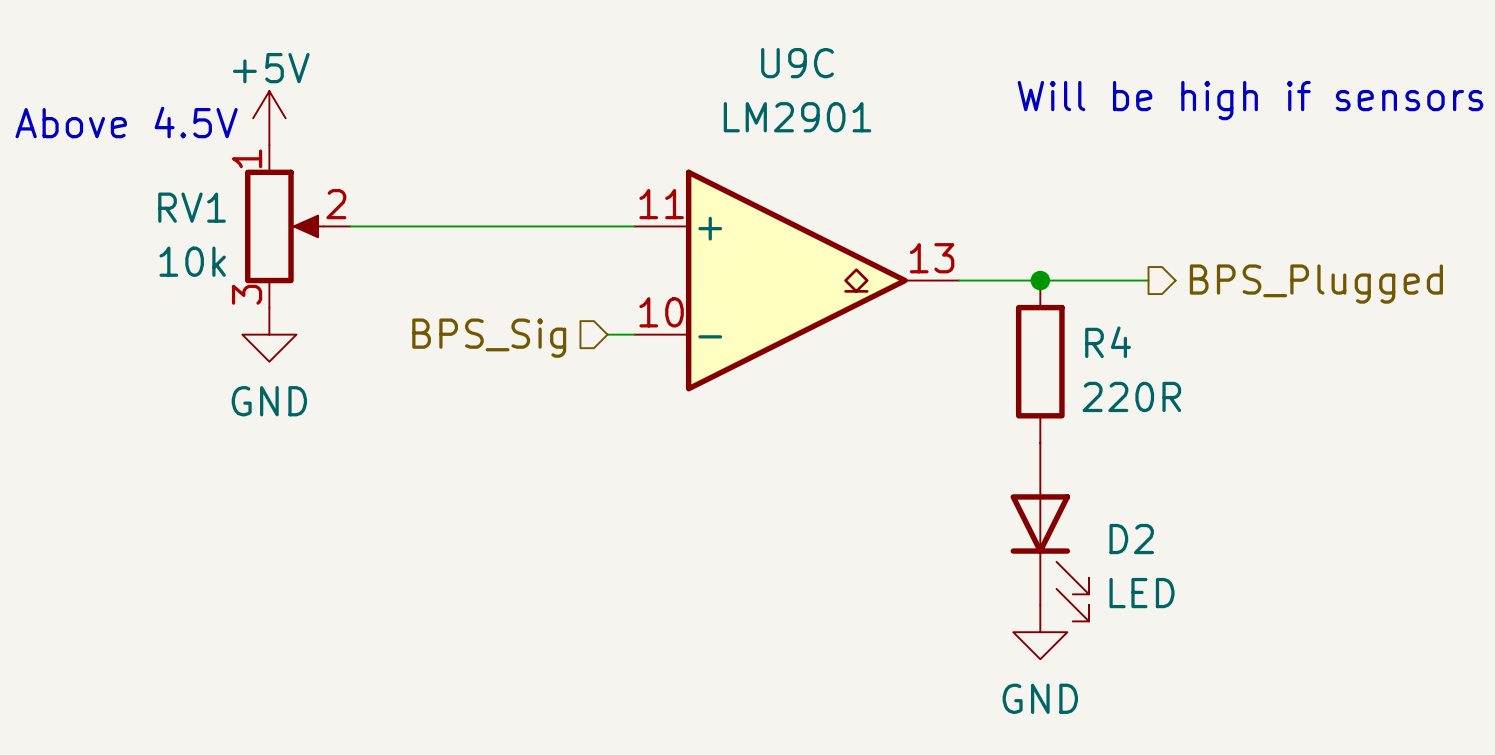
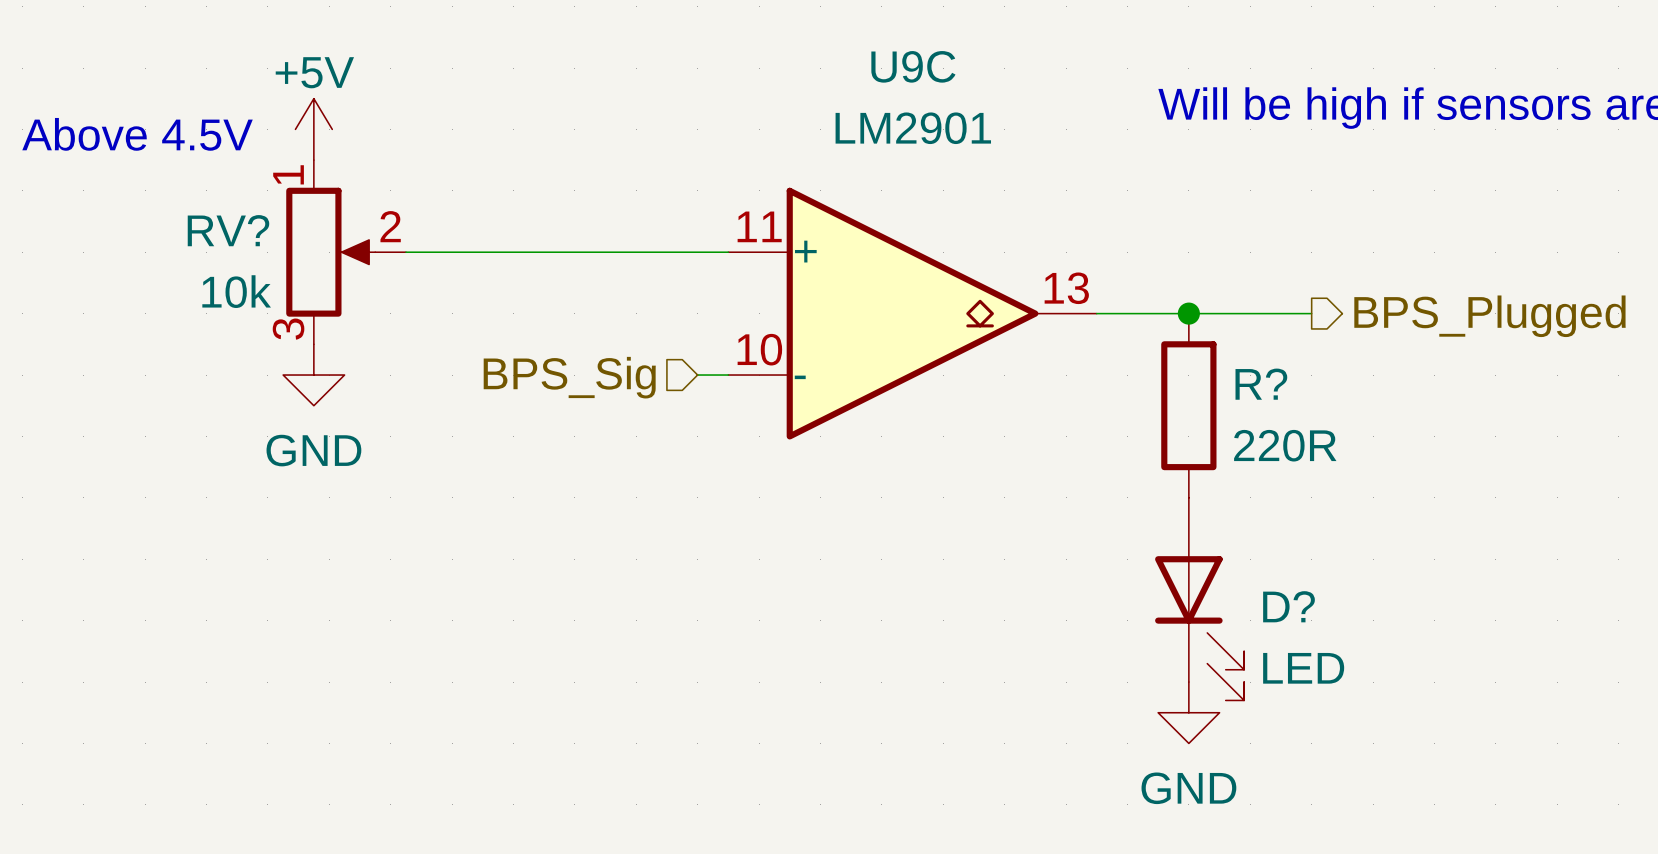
RV1 name: RV1 (192, 207) -> RV? (228, 230)
R4 name: R4 (1108, 342) -> R? (1261, 384)
D2 name: D2 (1131, 539) -> D? (1289, 606)

